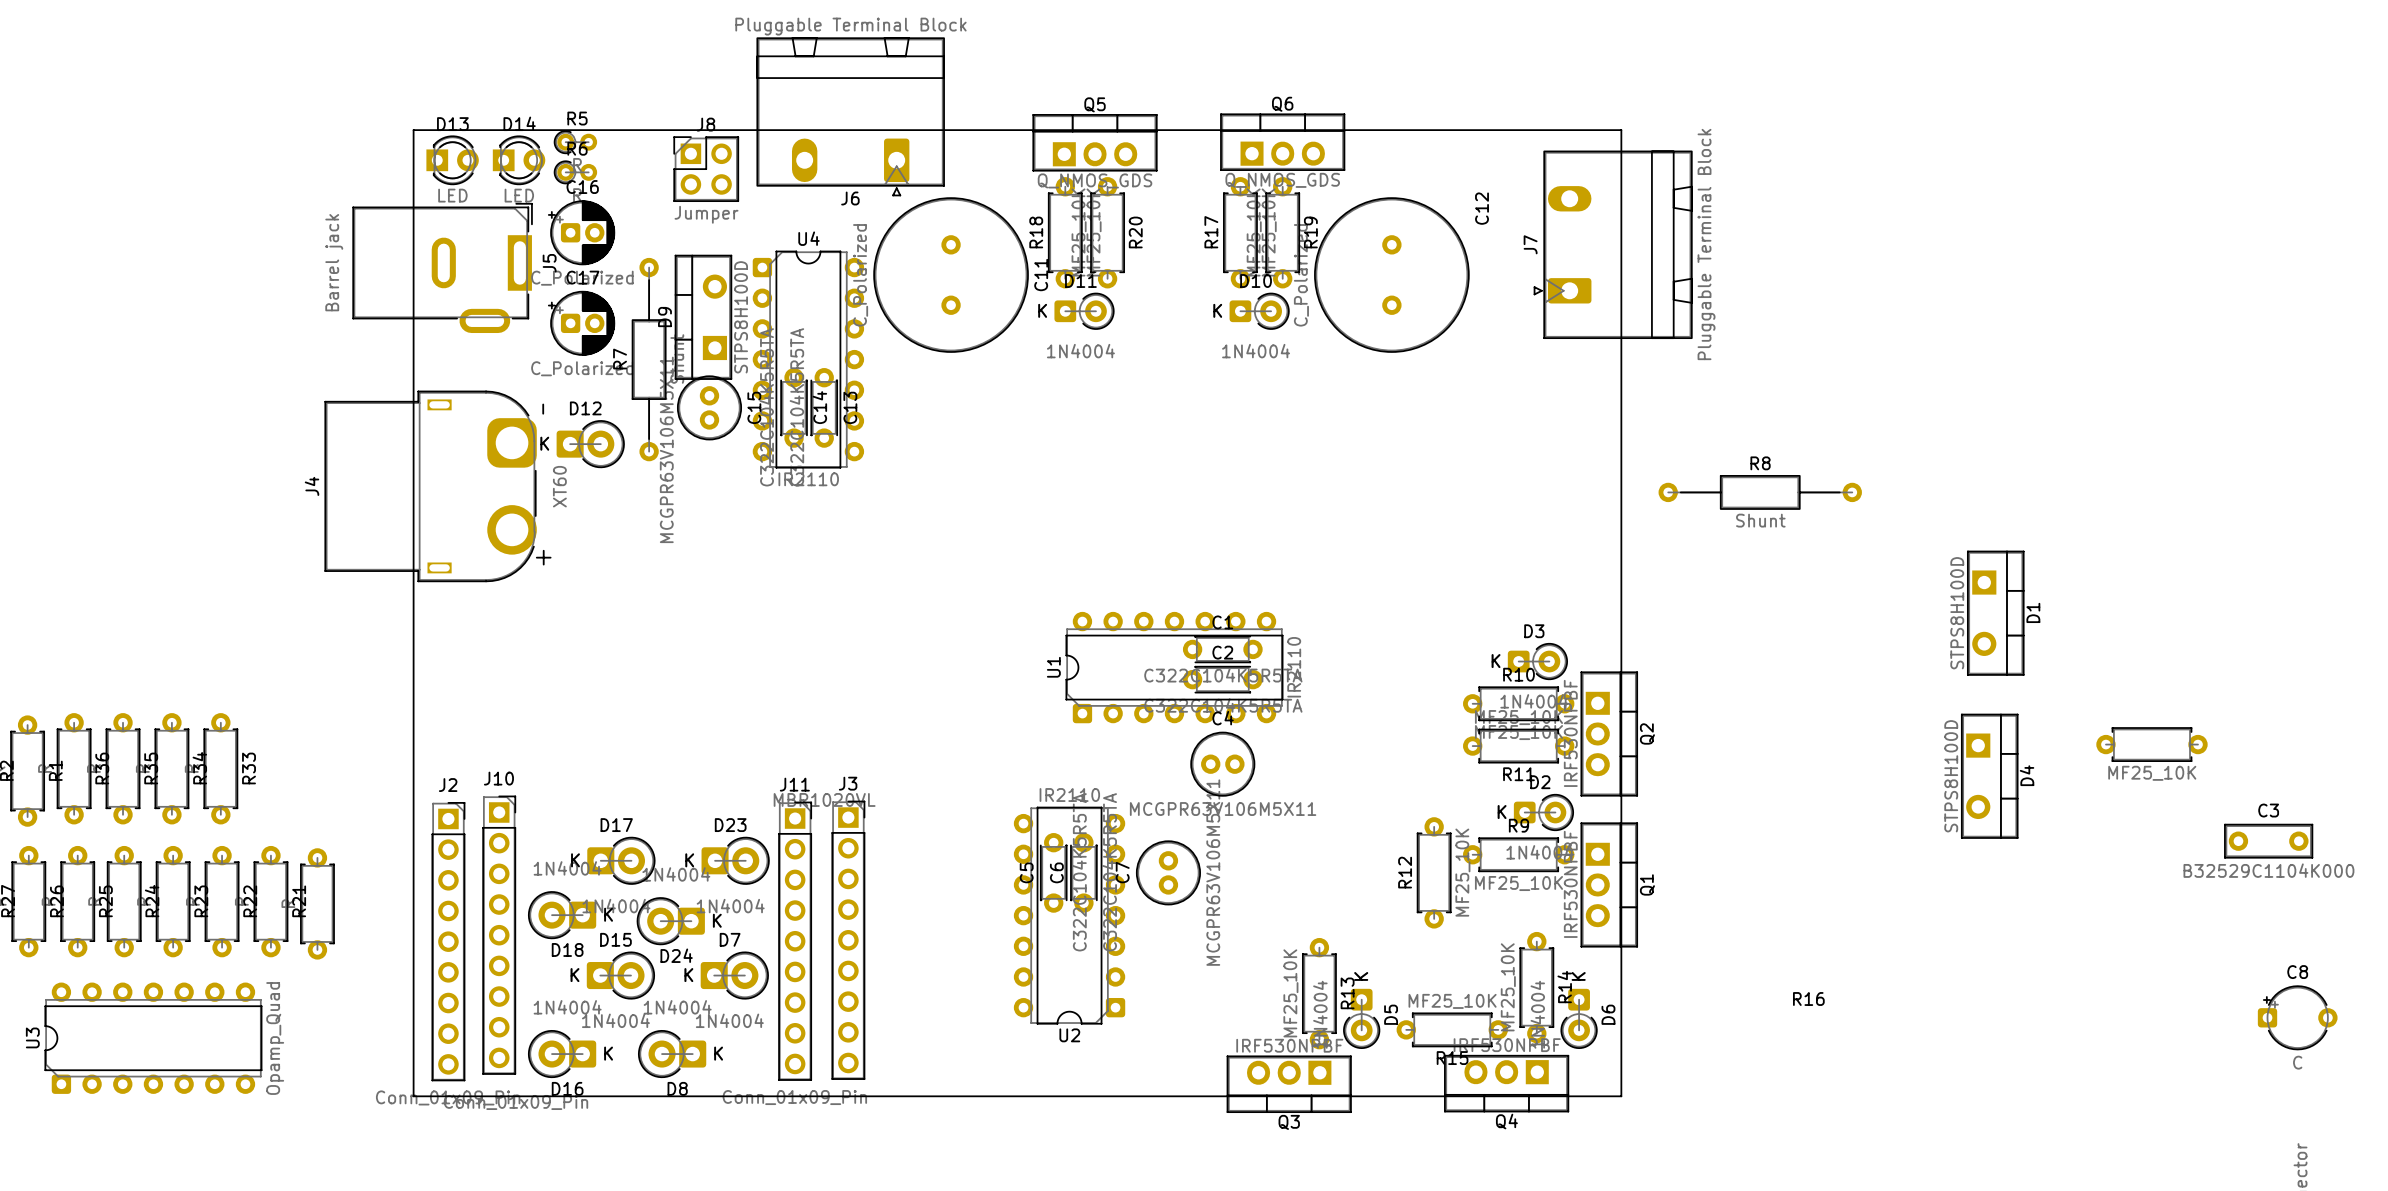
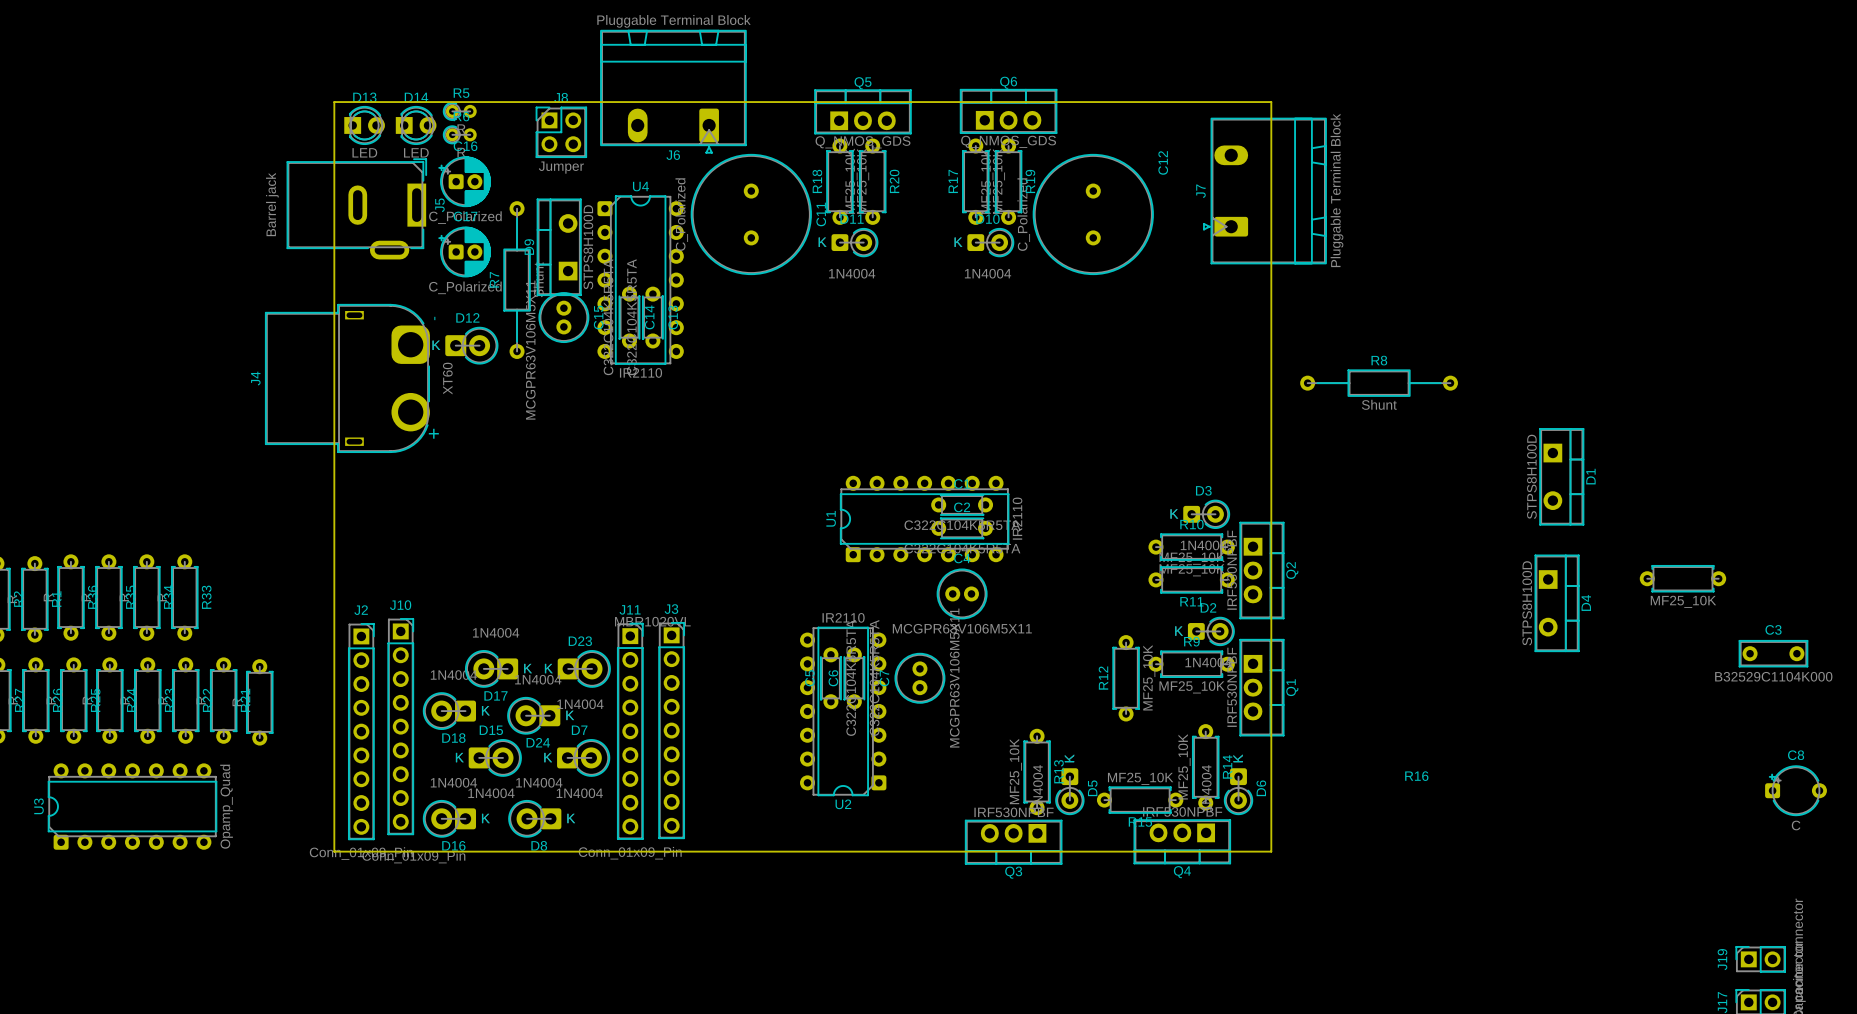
D17 rotation: 0° (621, 860) -> 180° (491, 668)

